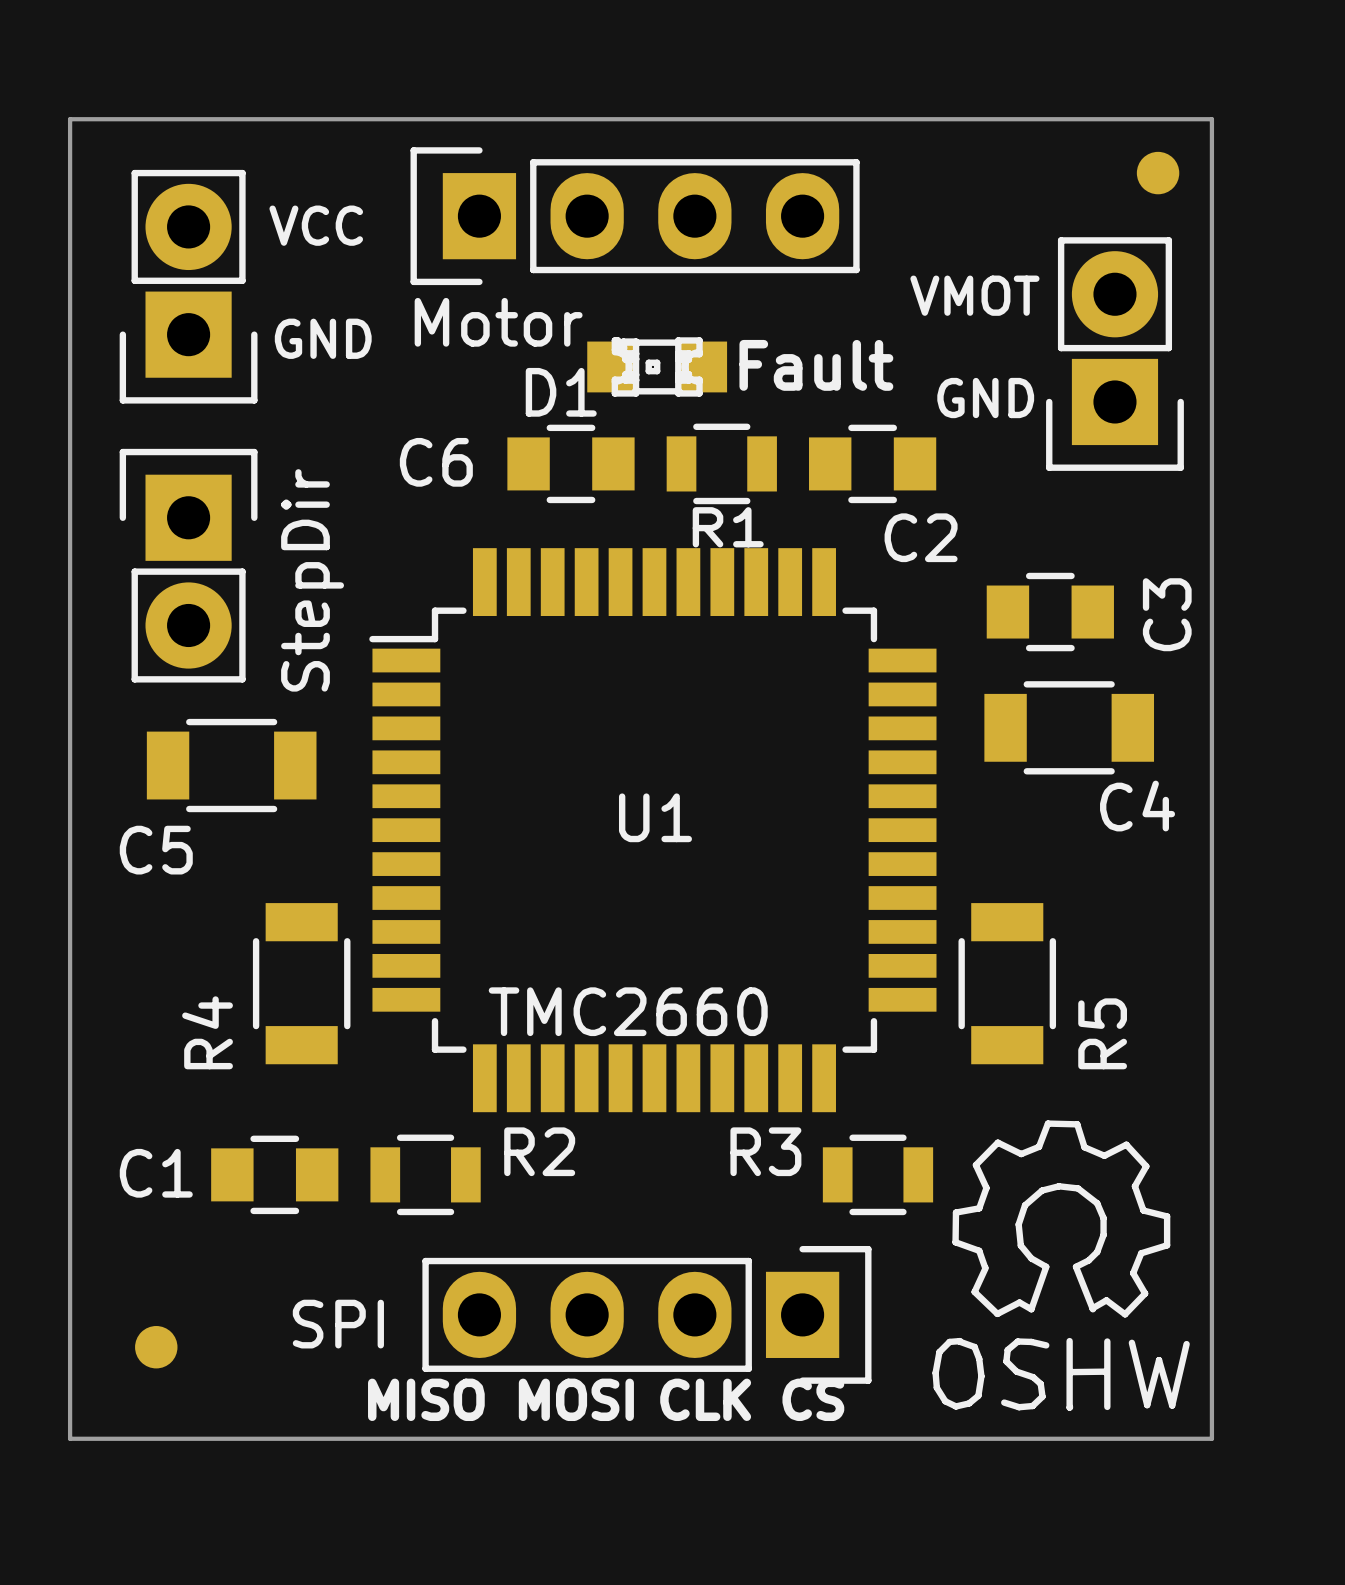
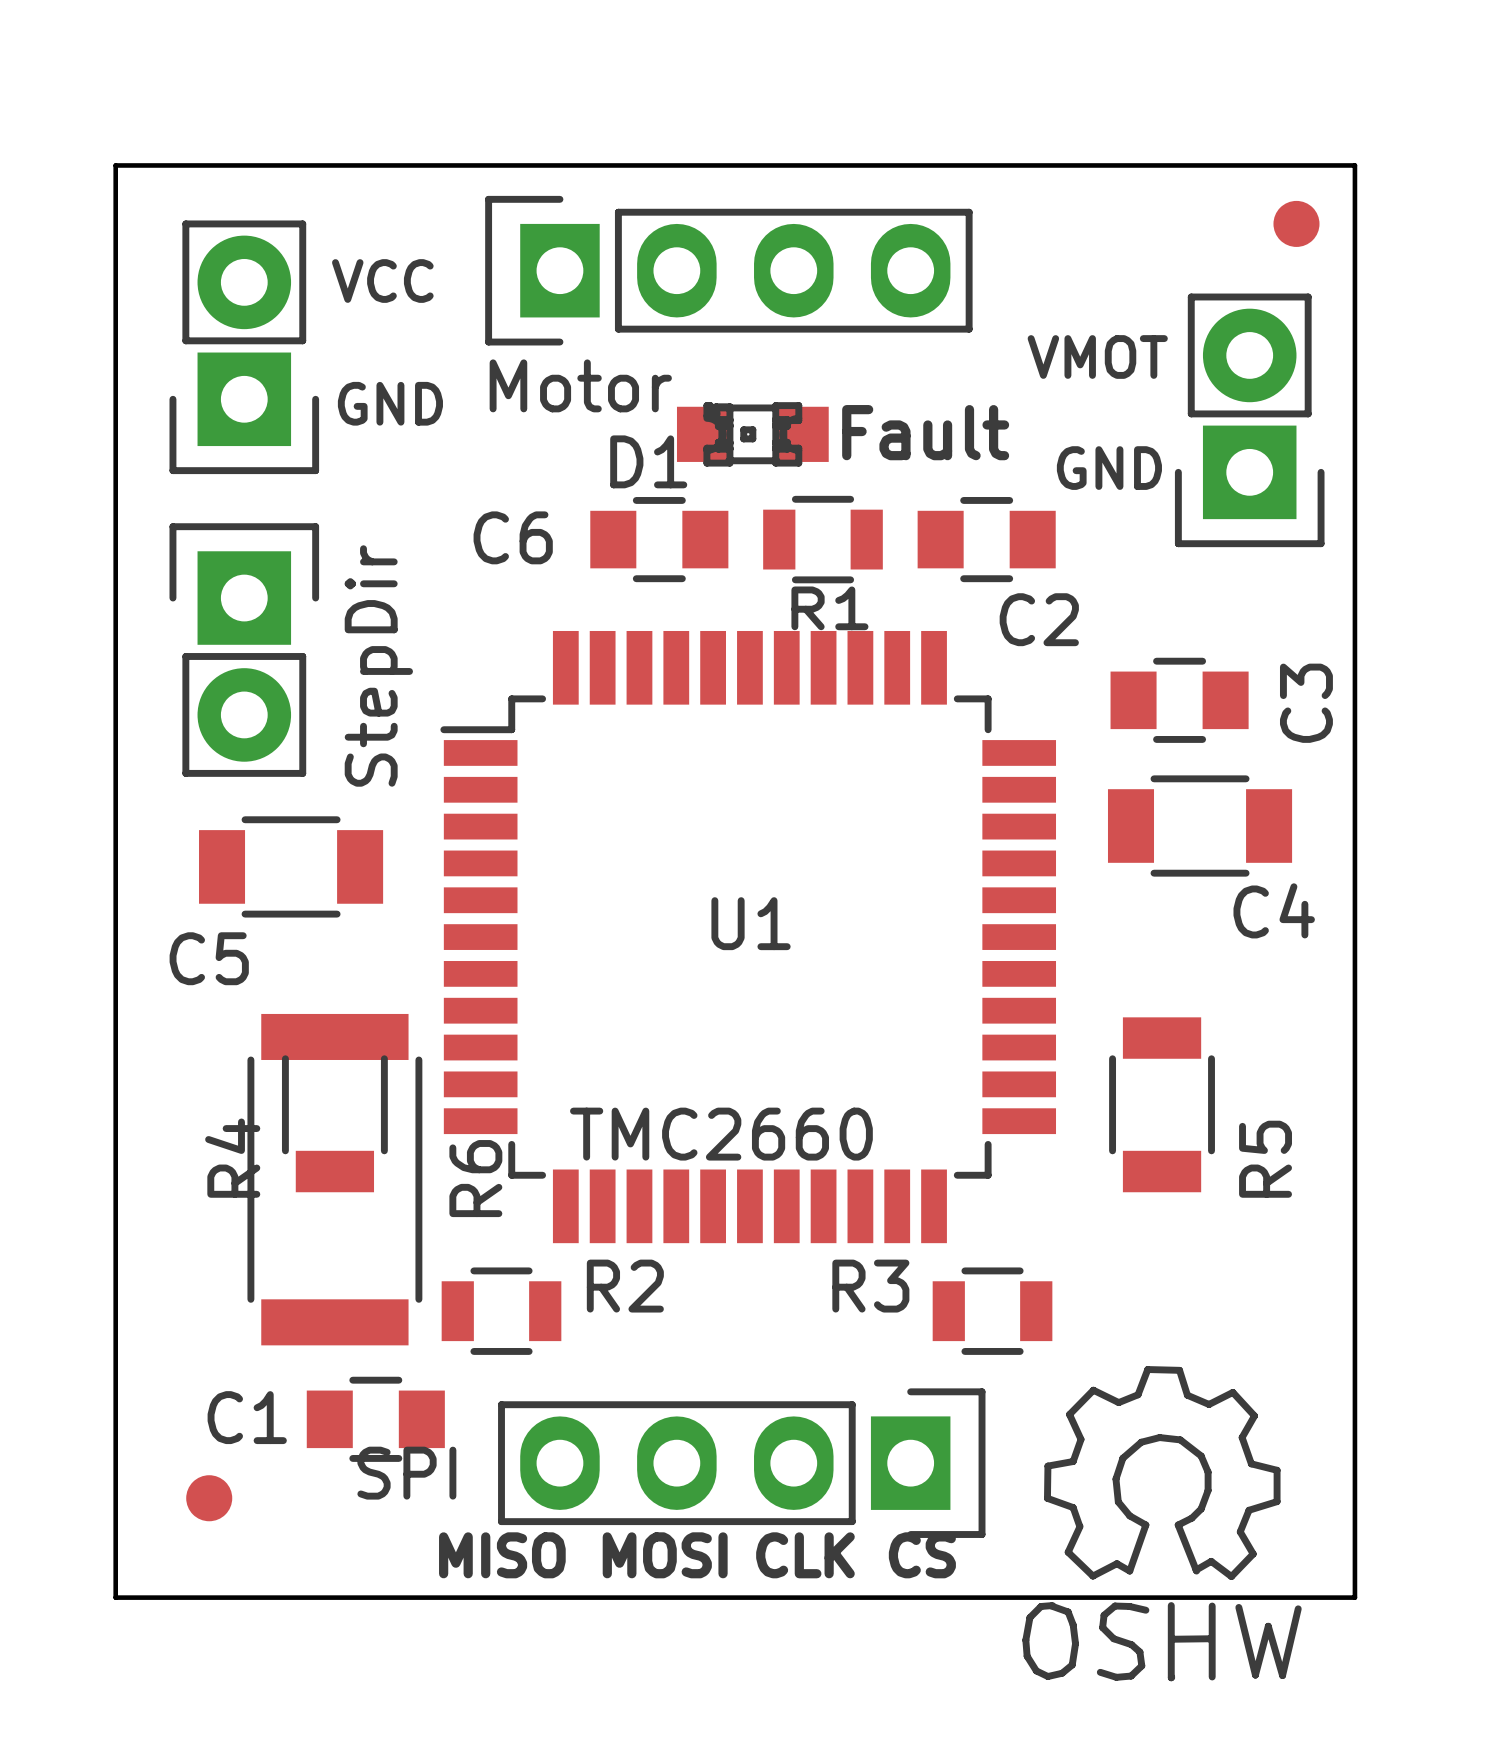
R4 position: (301, 983) -> (334, 1104)
R5 position: (1007, 983) -> (1162, 1104)
R6: none -> (334, 1179)
C1 position: (274, 1174) -> (375, 1419)
drawing position: (1061, 1265) -> (1162, 1523)

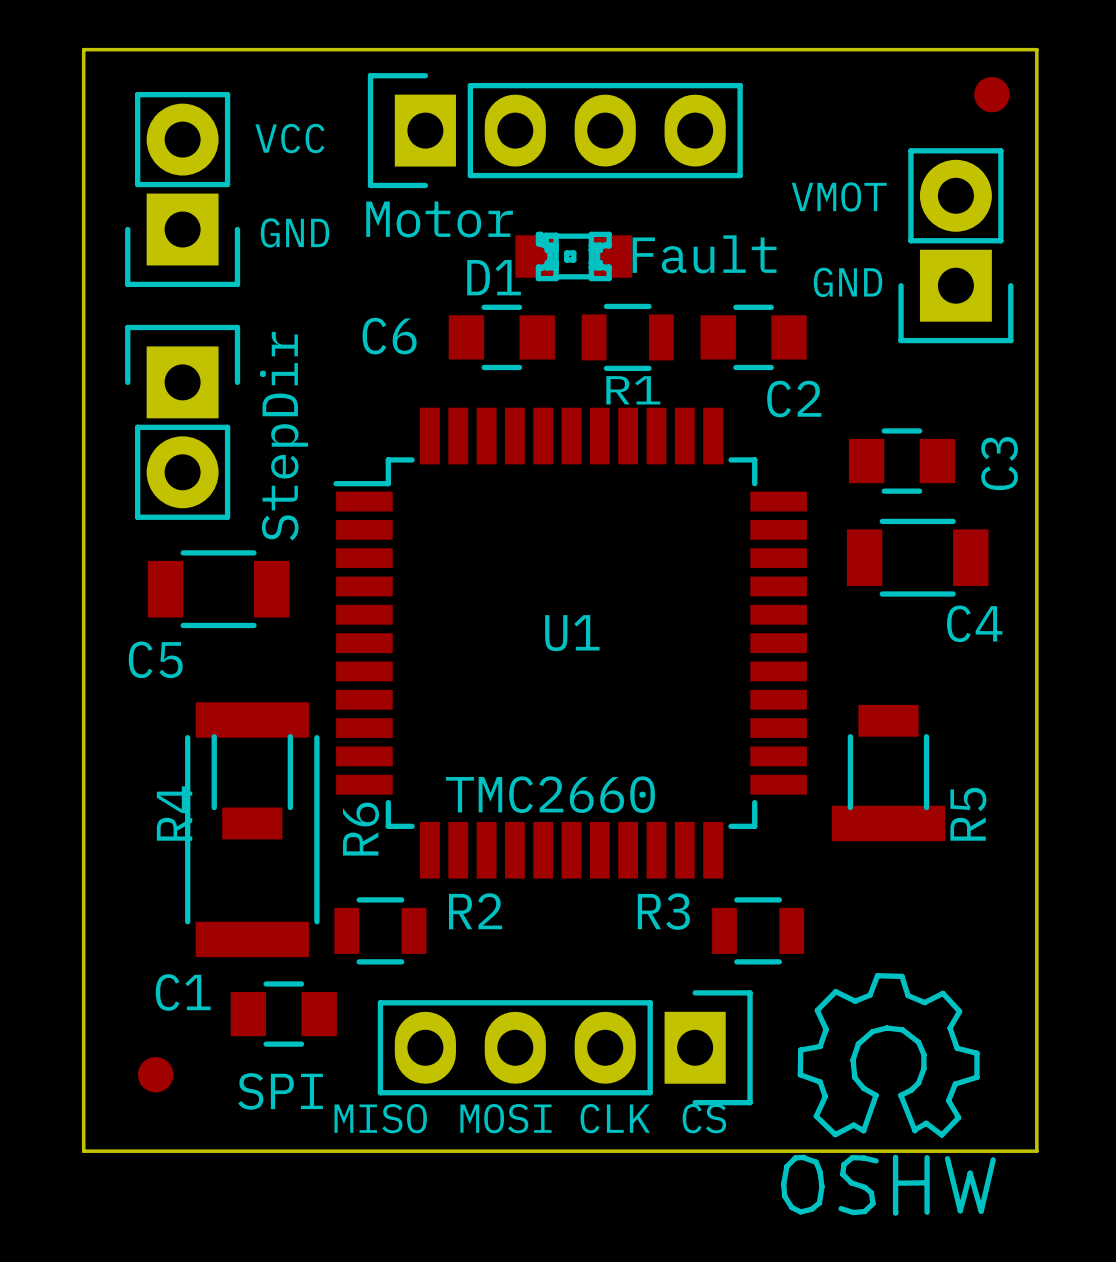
R5 footprint: [1109, 1017, 1215, 1193] -> [831, 704, 946, 842]
C1 name position: C1 (247, 1417) -> C1 (183, 992)
part value position: SPI (406, 1473) -> SPI (280, 1091)

